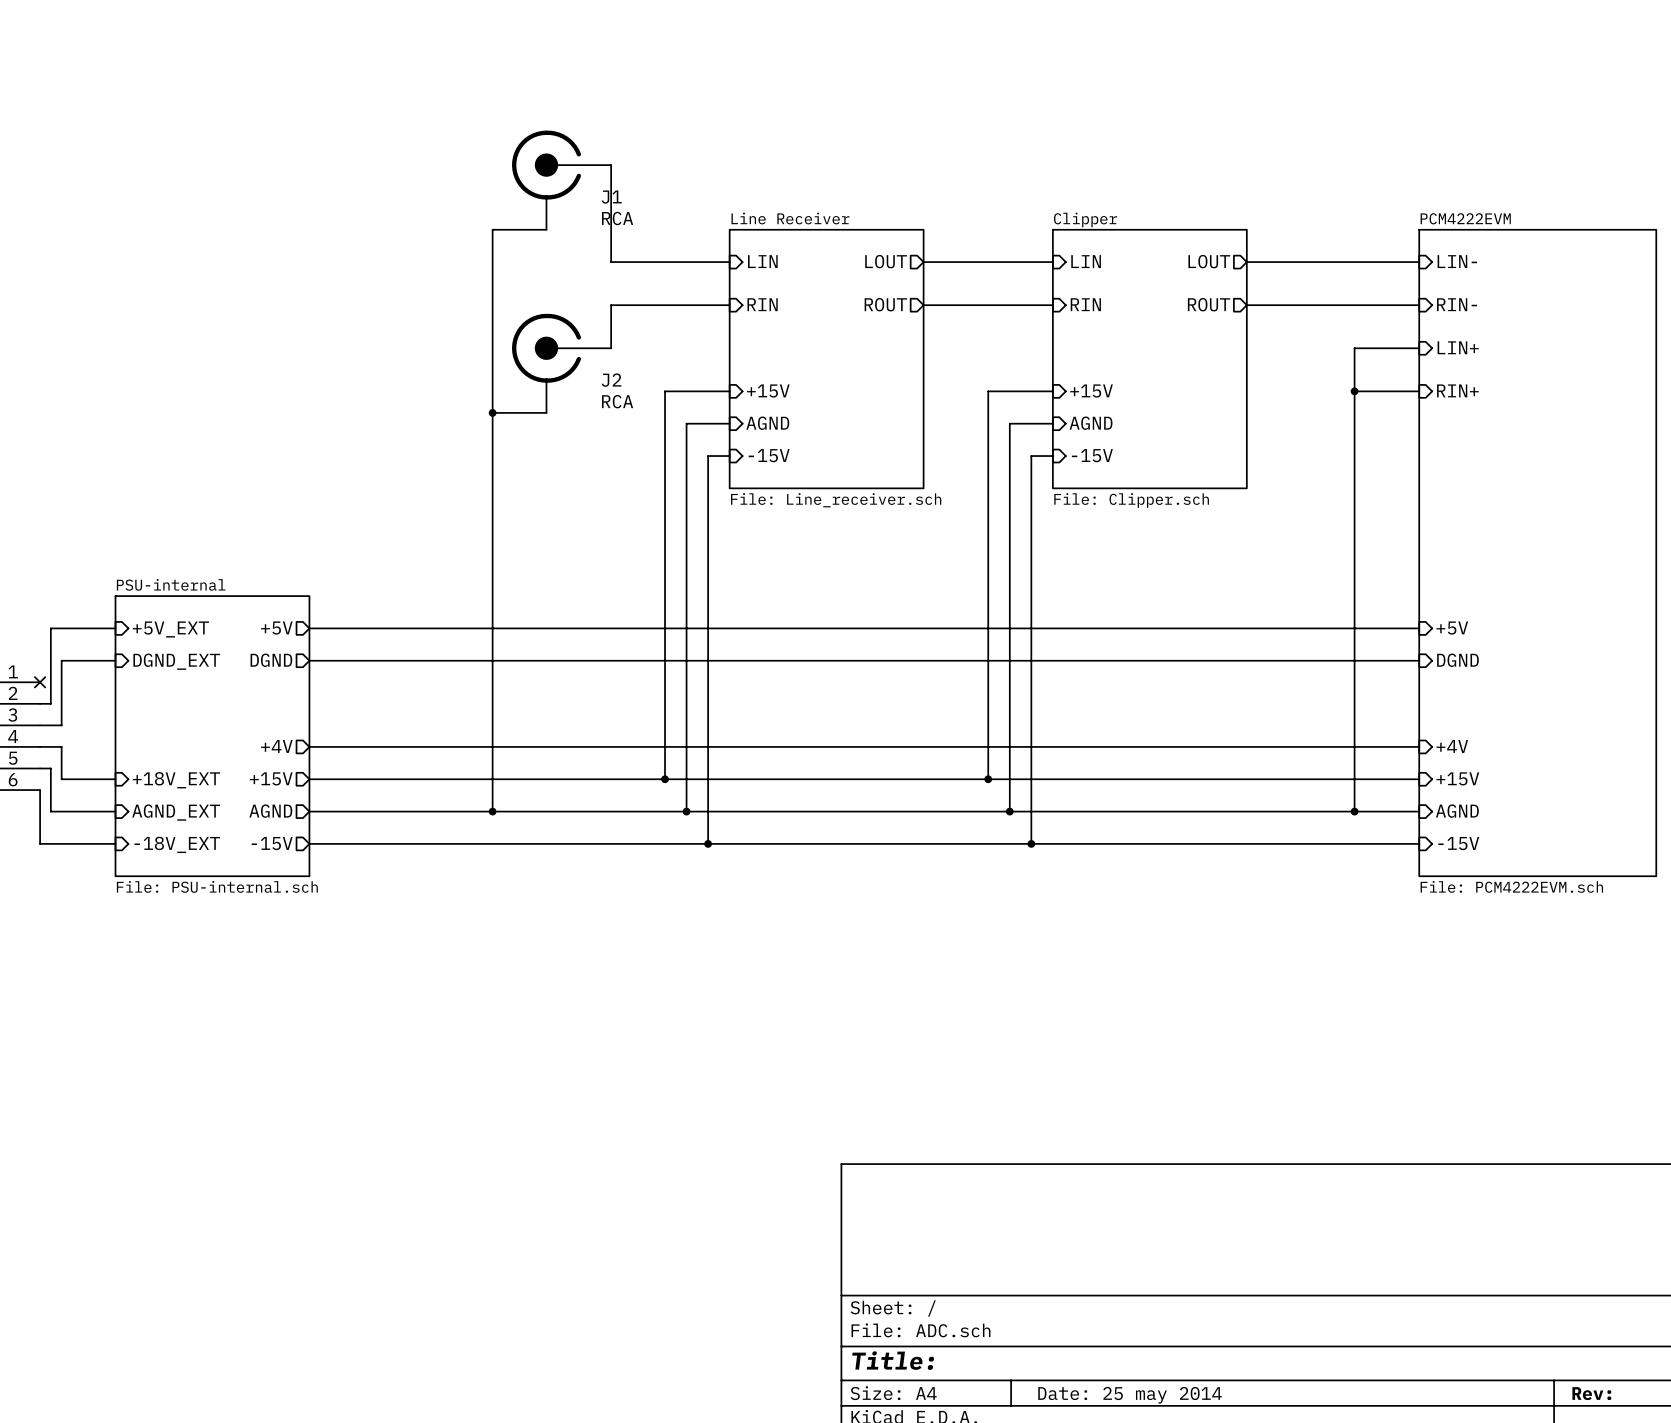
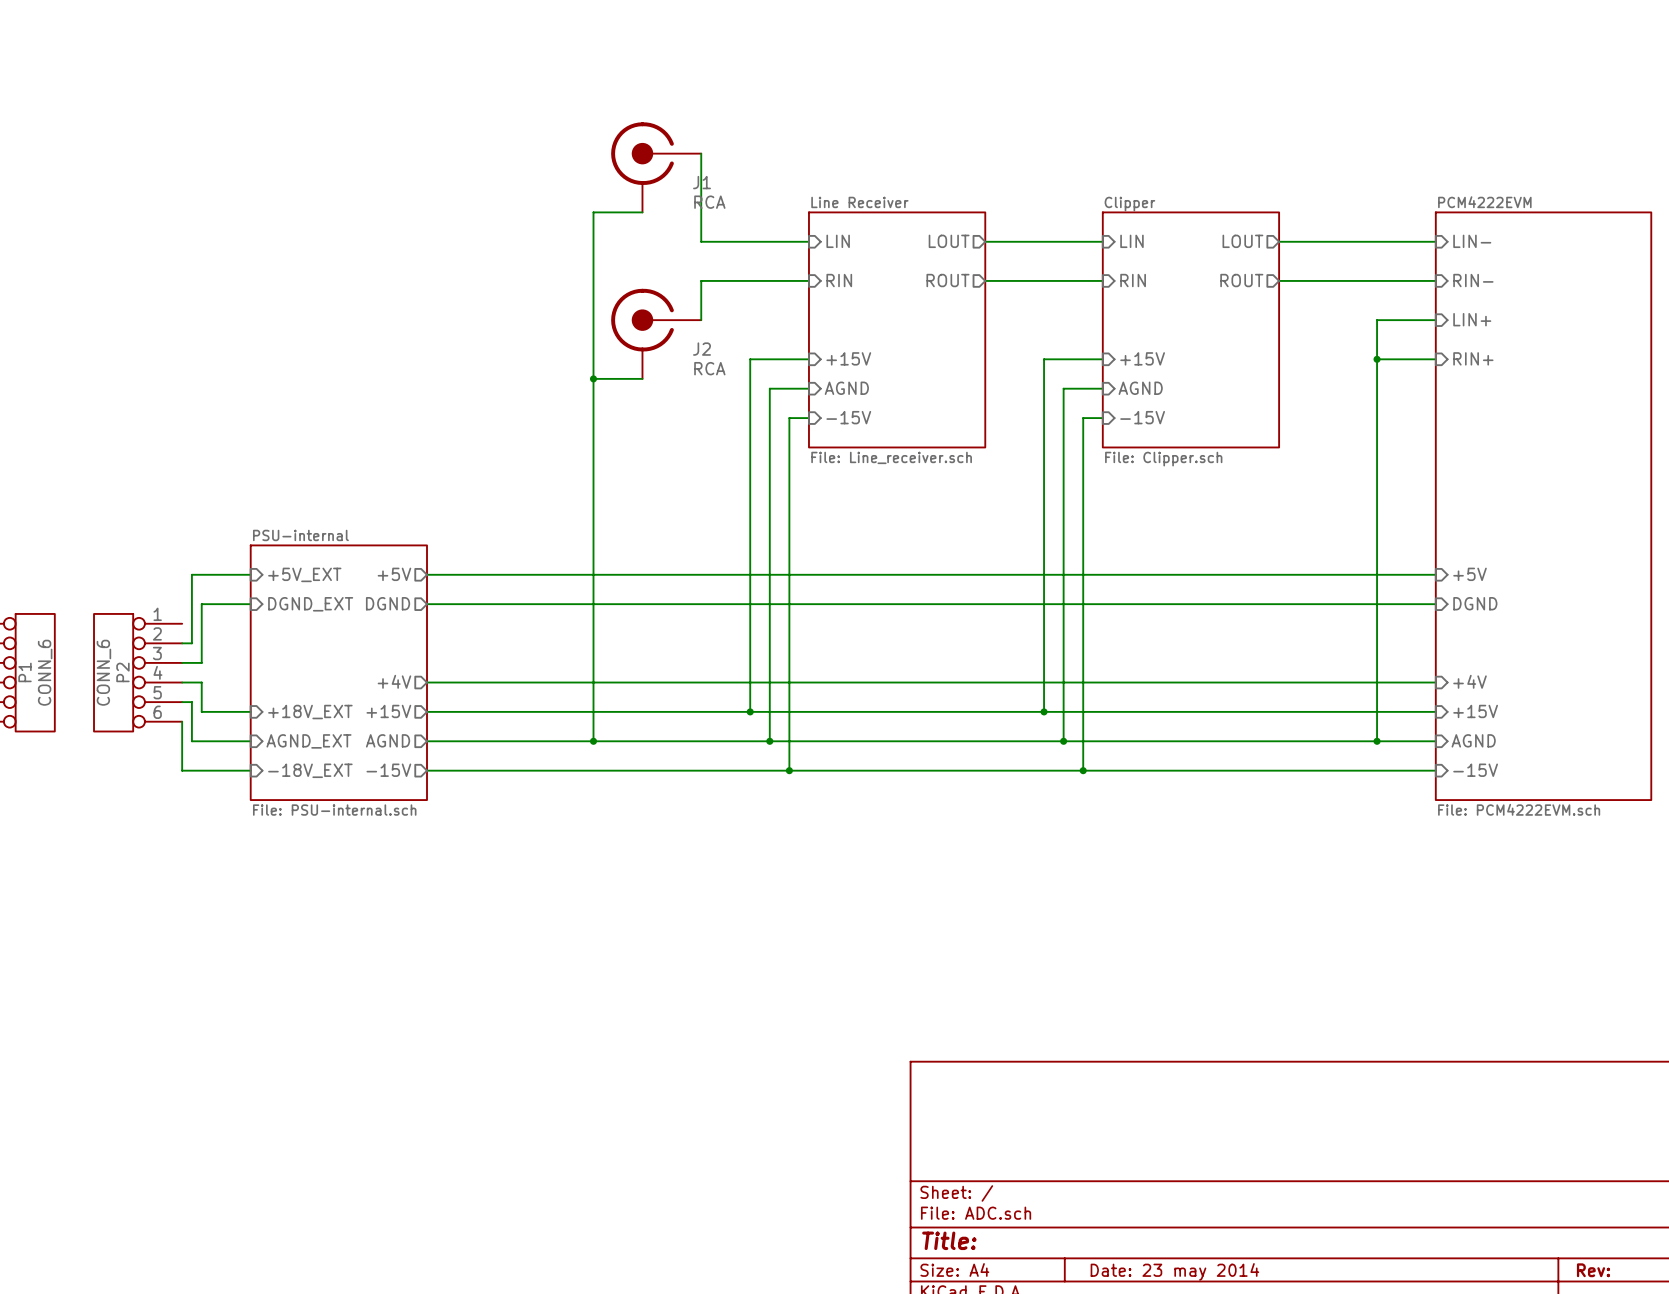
no-connect mark: (40, 682) -> none
title block: Date: 25 may 2014 (1130, 1395) -> Date: 23 may 2014 (1174, 1271)

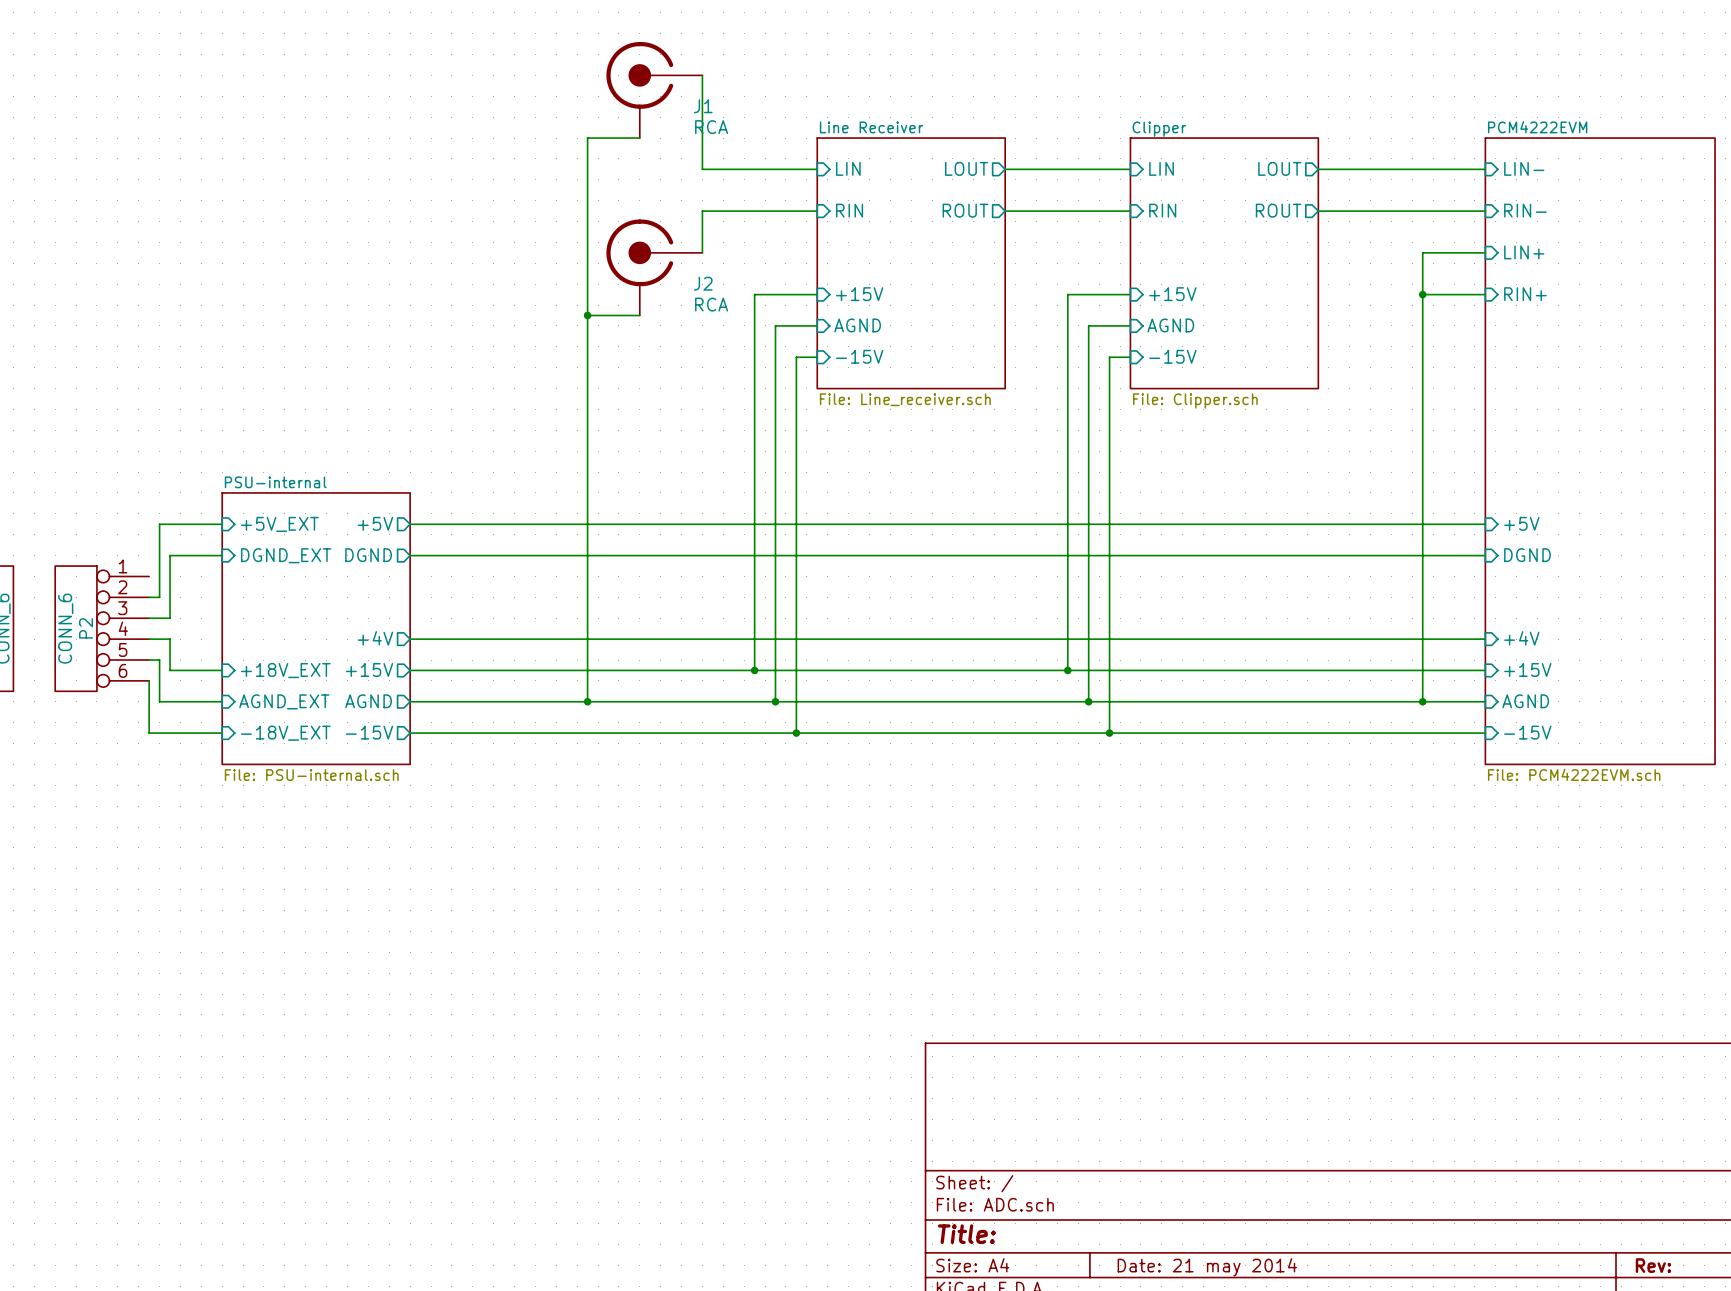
title block: Date: 23 may 2014 (1174, 1271) -> Date: 21 may 2014 (1207, 1267)

